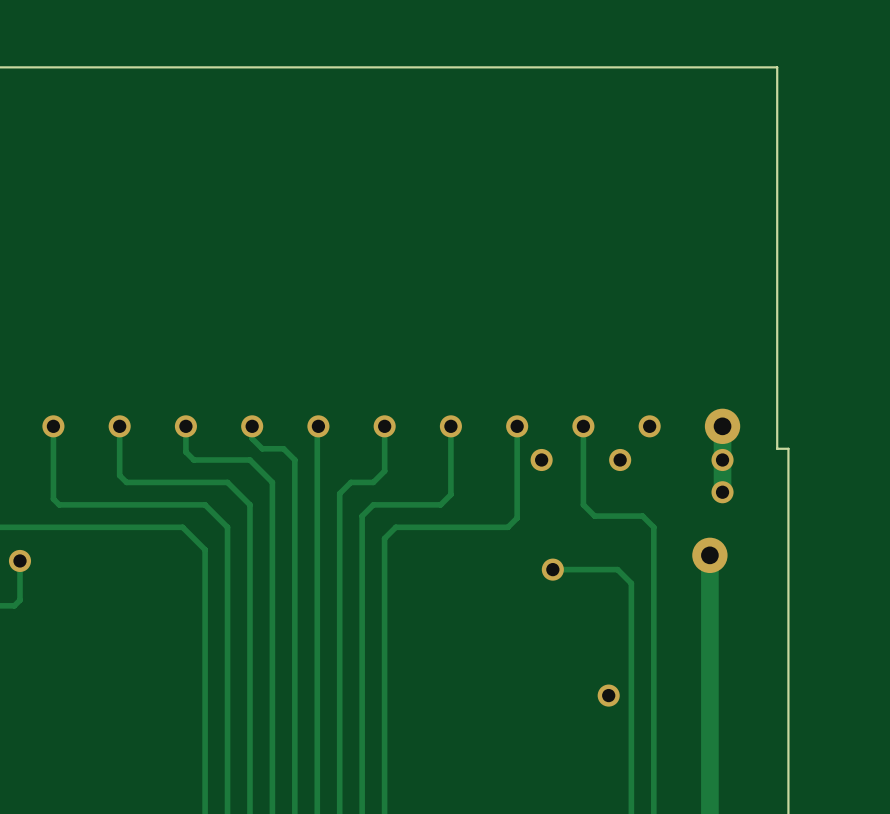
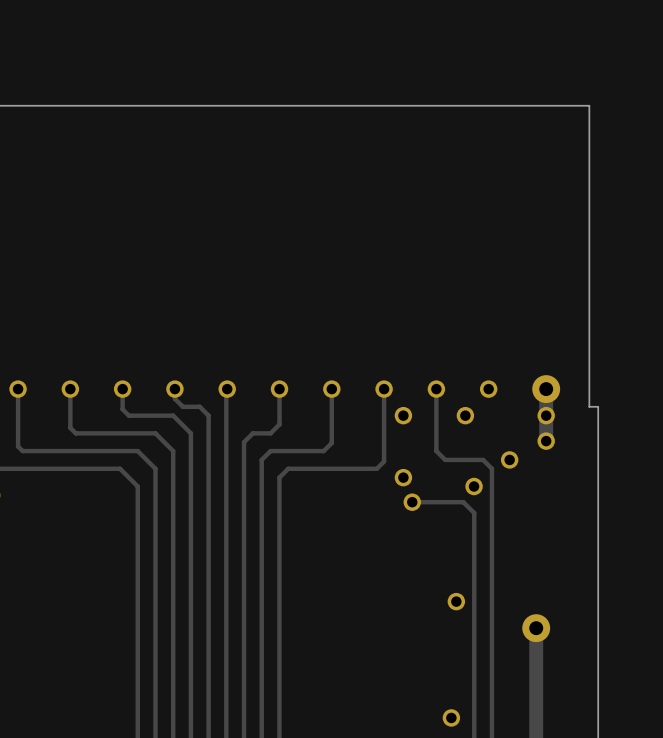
via: none -> (509, 459)
via: none -> (403, 477)
via: none -> (474, 486)
track: (709, 555) (709, 729) -> none
via position: (709, 555) -> (536, 628)

